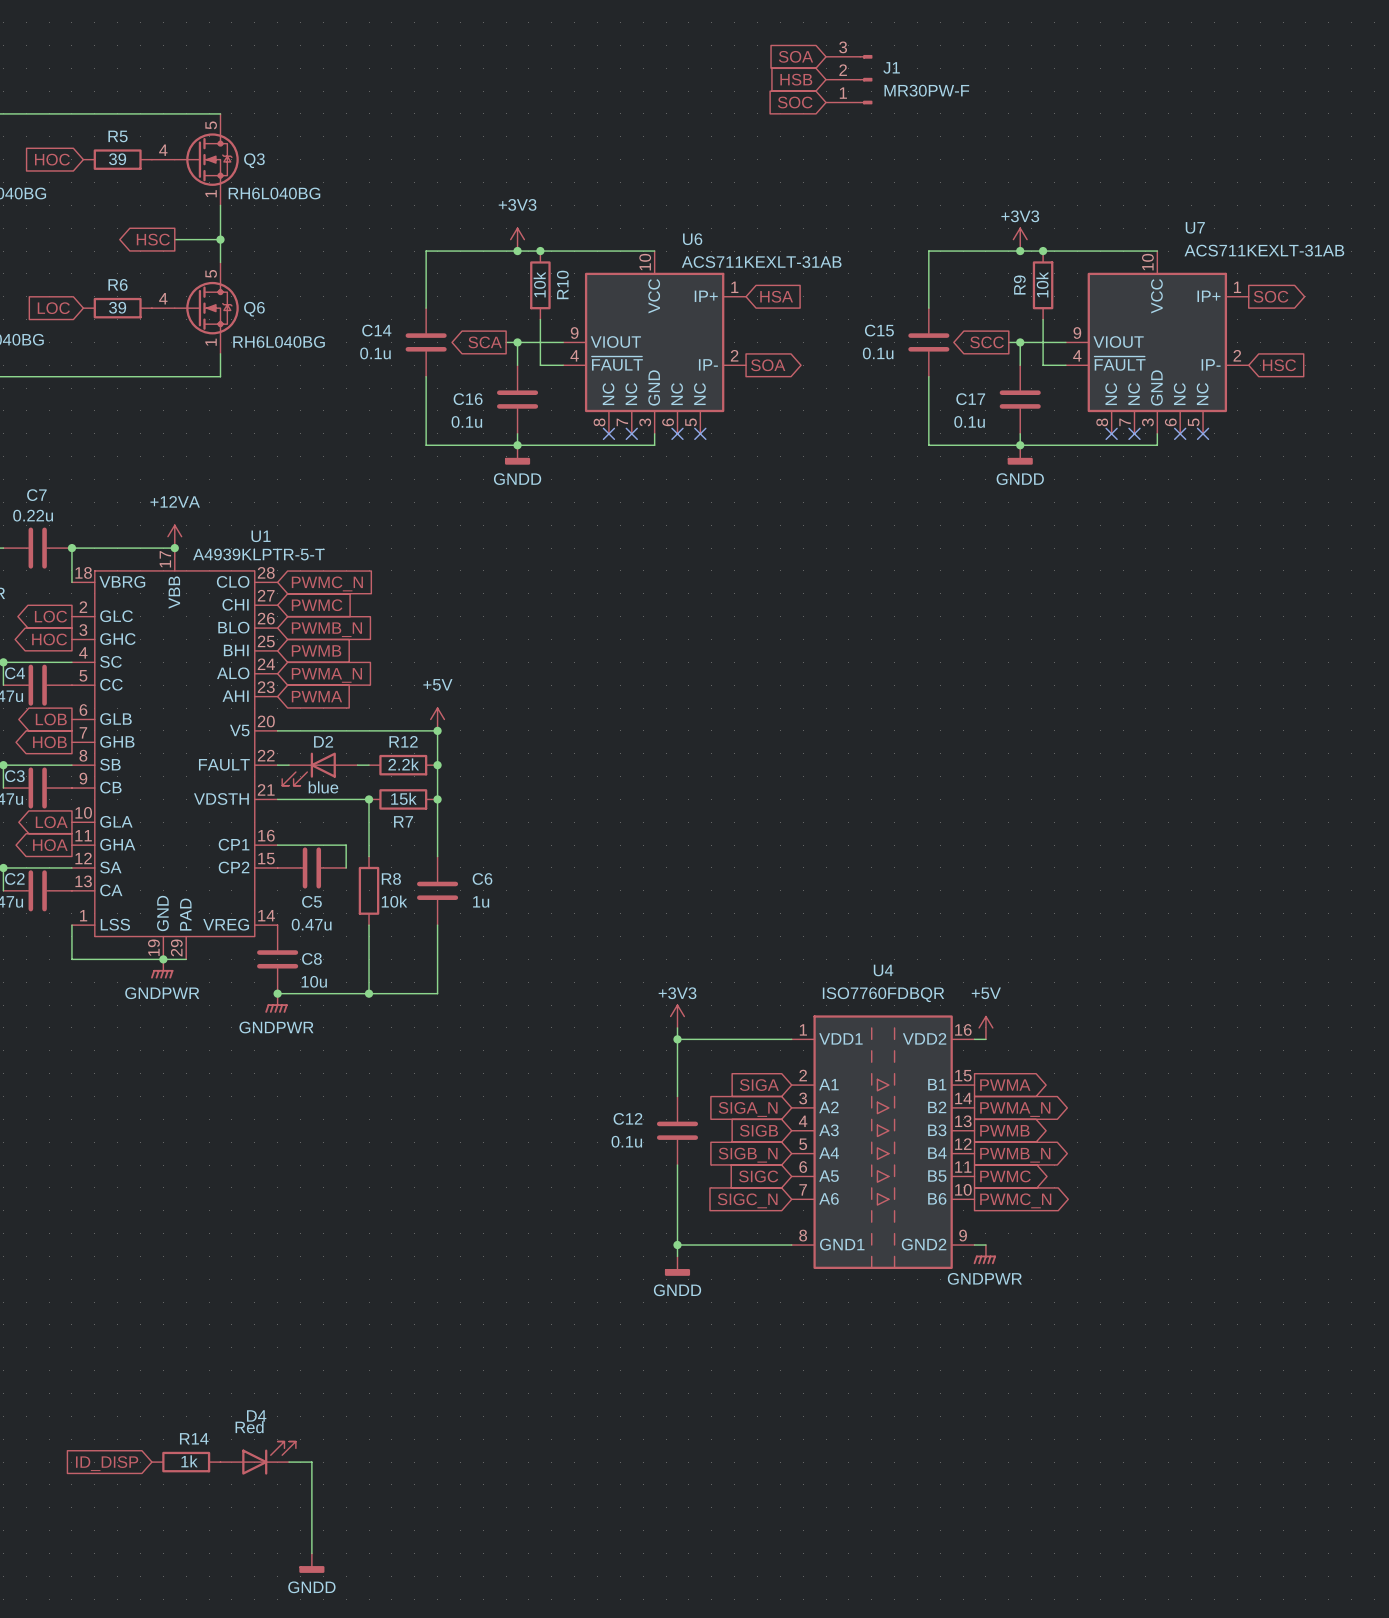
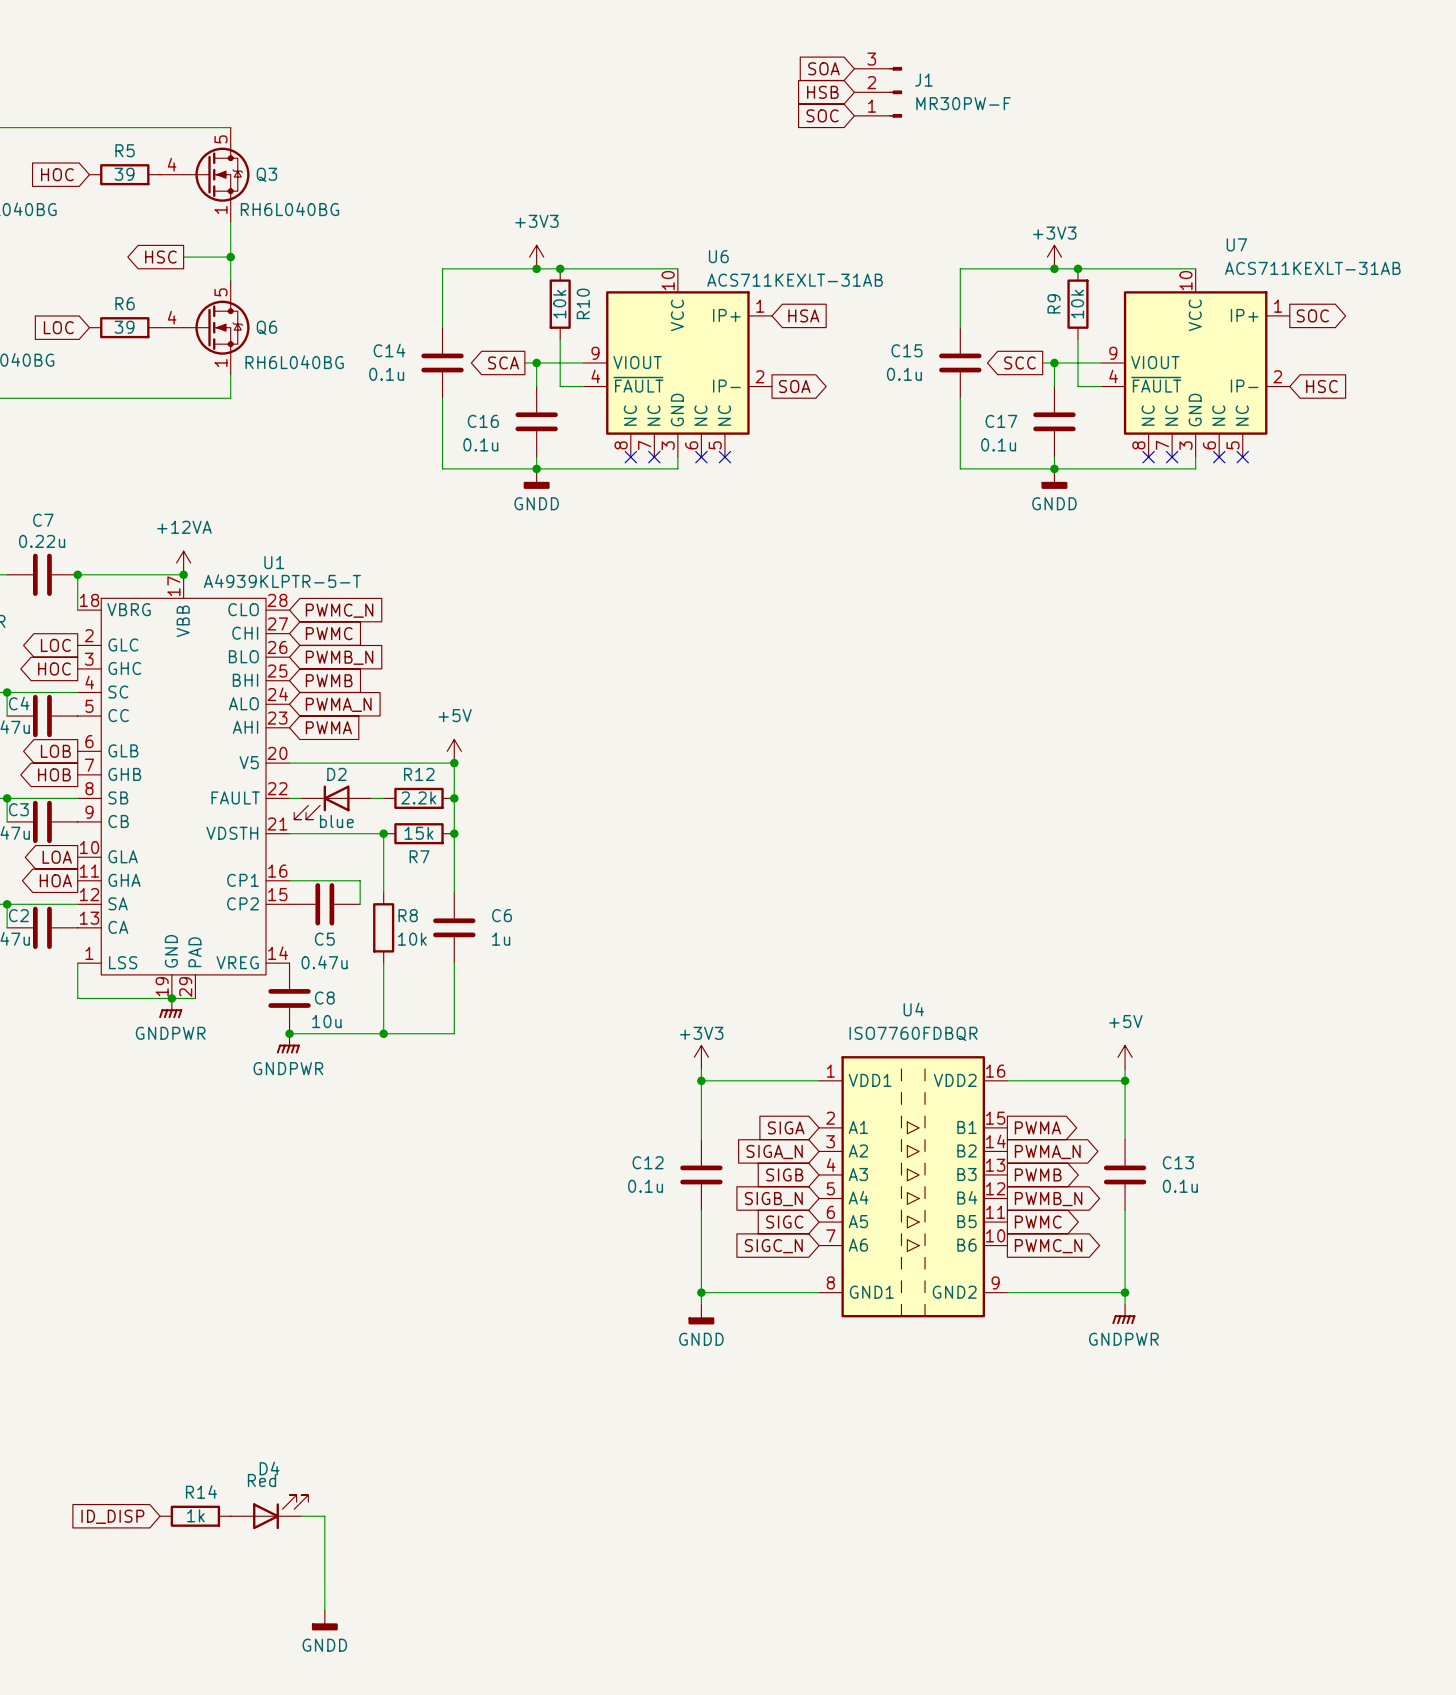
power symbol position: +5V (985, 1027) -> +5V (1125, 1057)
wire: none -> (1125, 1069) (1125, 1139)
wire: none -> (1019, 1080) (1125, 1080)
junction: none -> (1125, 1080)
C13: none -> 0.1u (1125, 1174)
wire: none -> (1125, 1210) (1125, 1304)
wire: none -> (1019, 1292) (1125, 1292)
junction: none -> (1125, 1292)
power symbol position: GNDPWR (984, 1254) -> GNDPWR (1123, 1314)

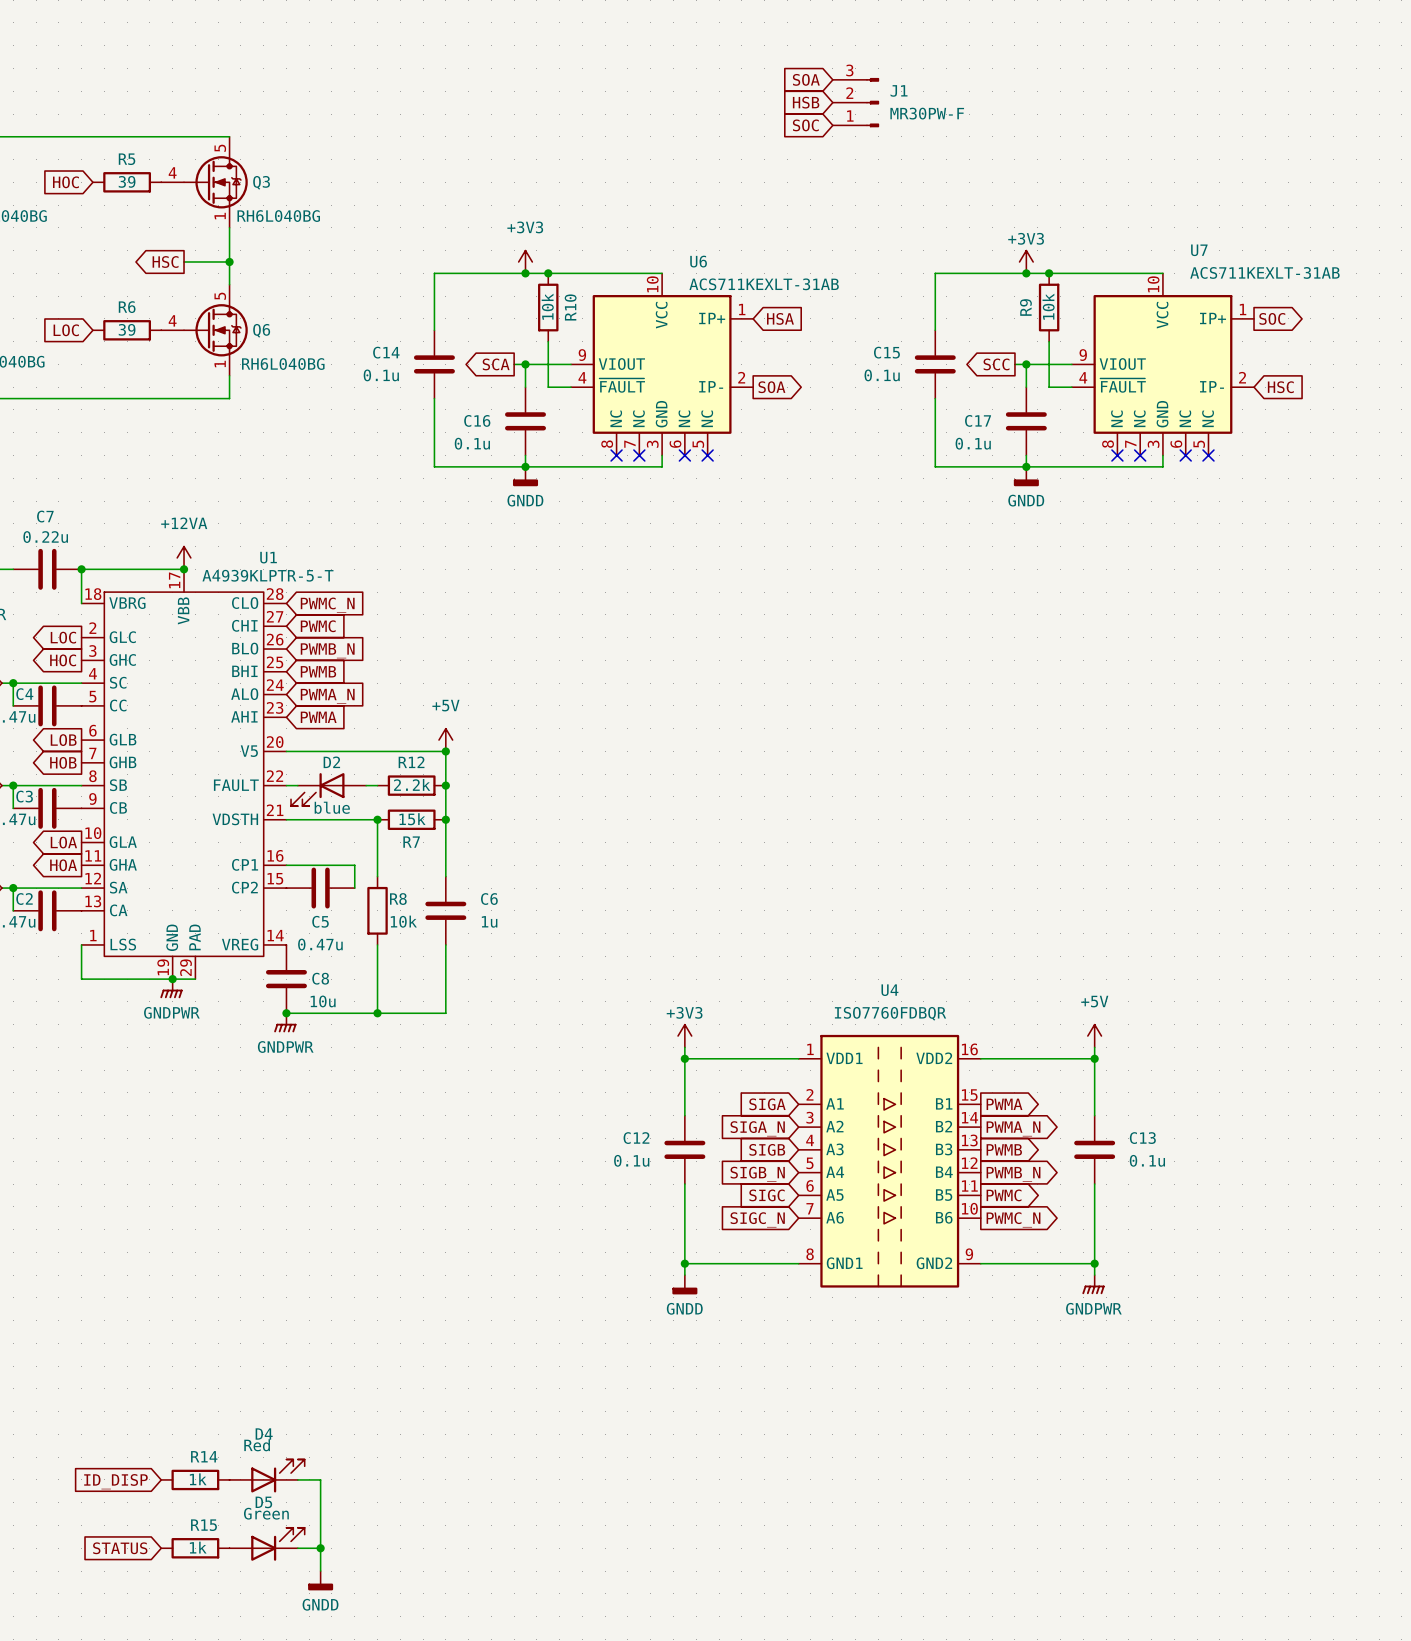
D5: none -> Green (267, 1544)
global label: none -> STATUS (120, 1548)
R15: none -> 1k (195, 1548)
wire: none -> (297, 1548) (320, 1548)
junction: none -> (320, 1548)

